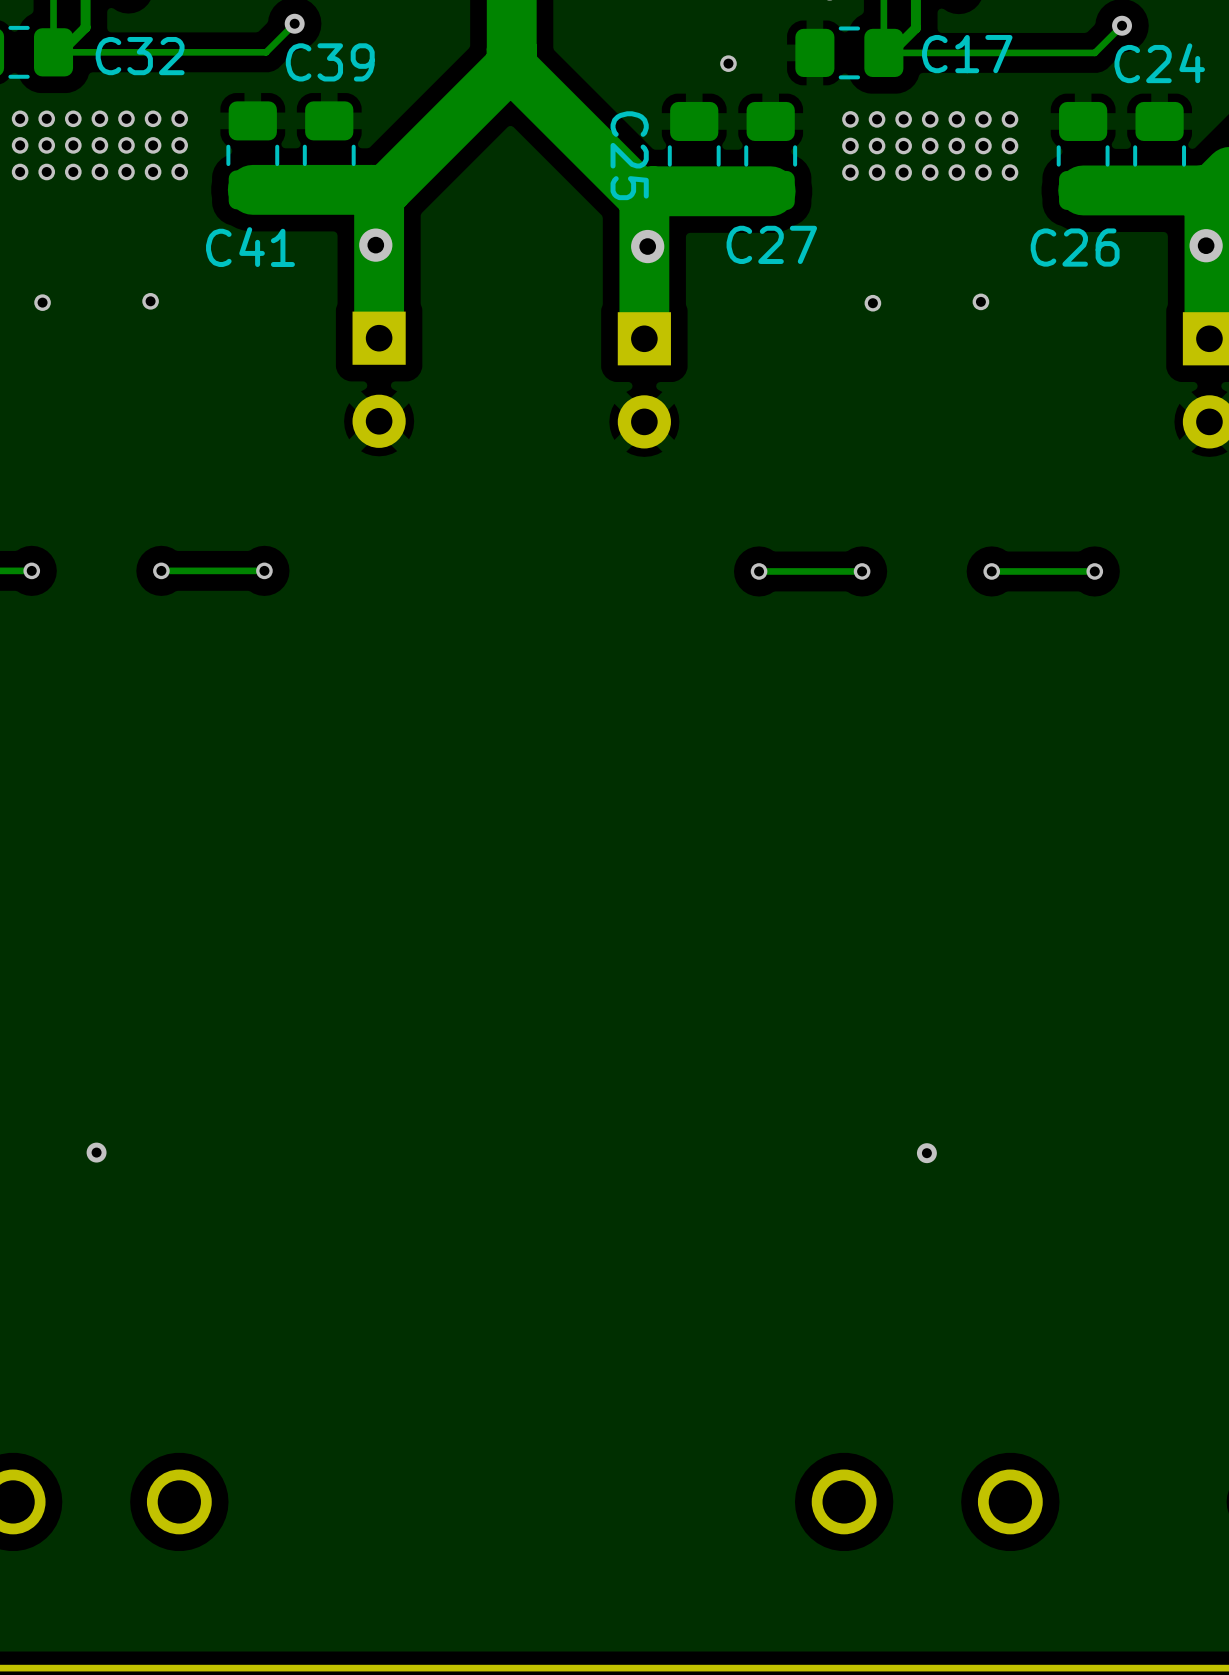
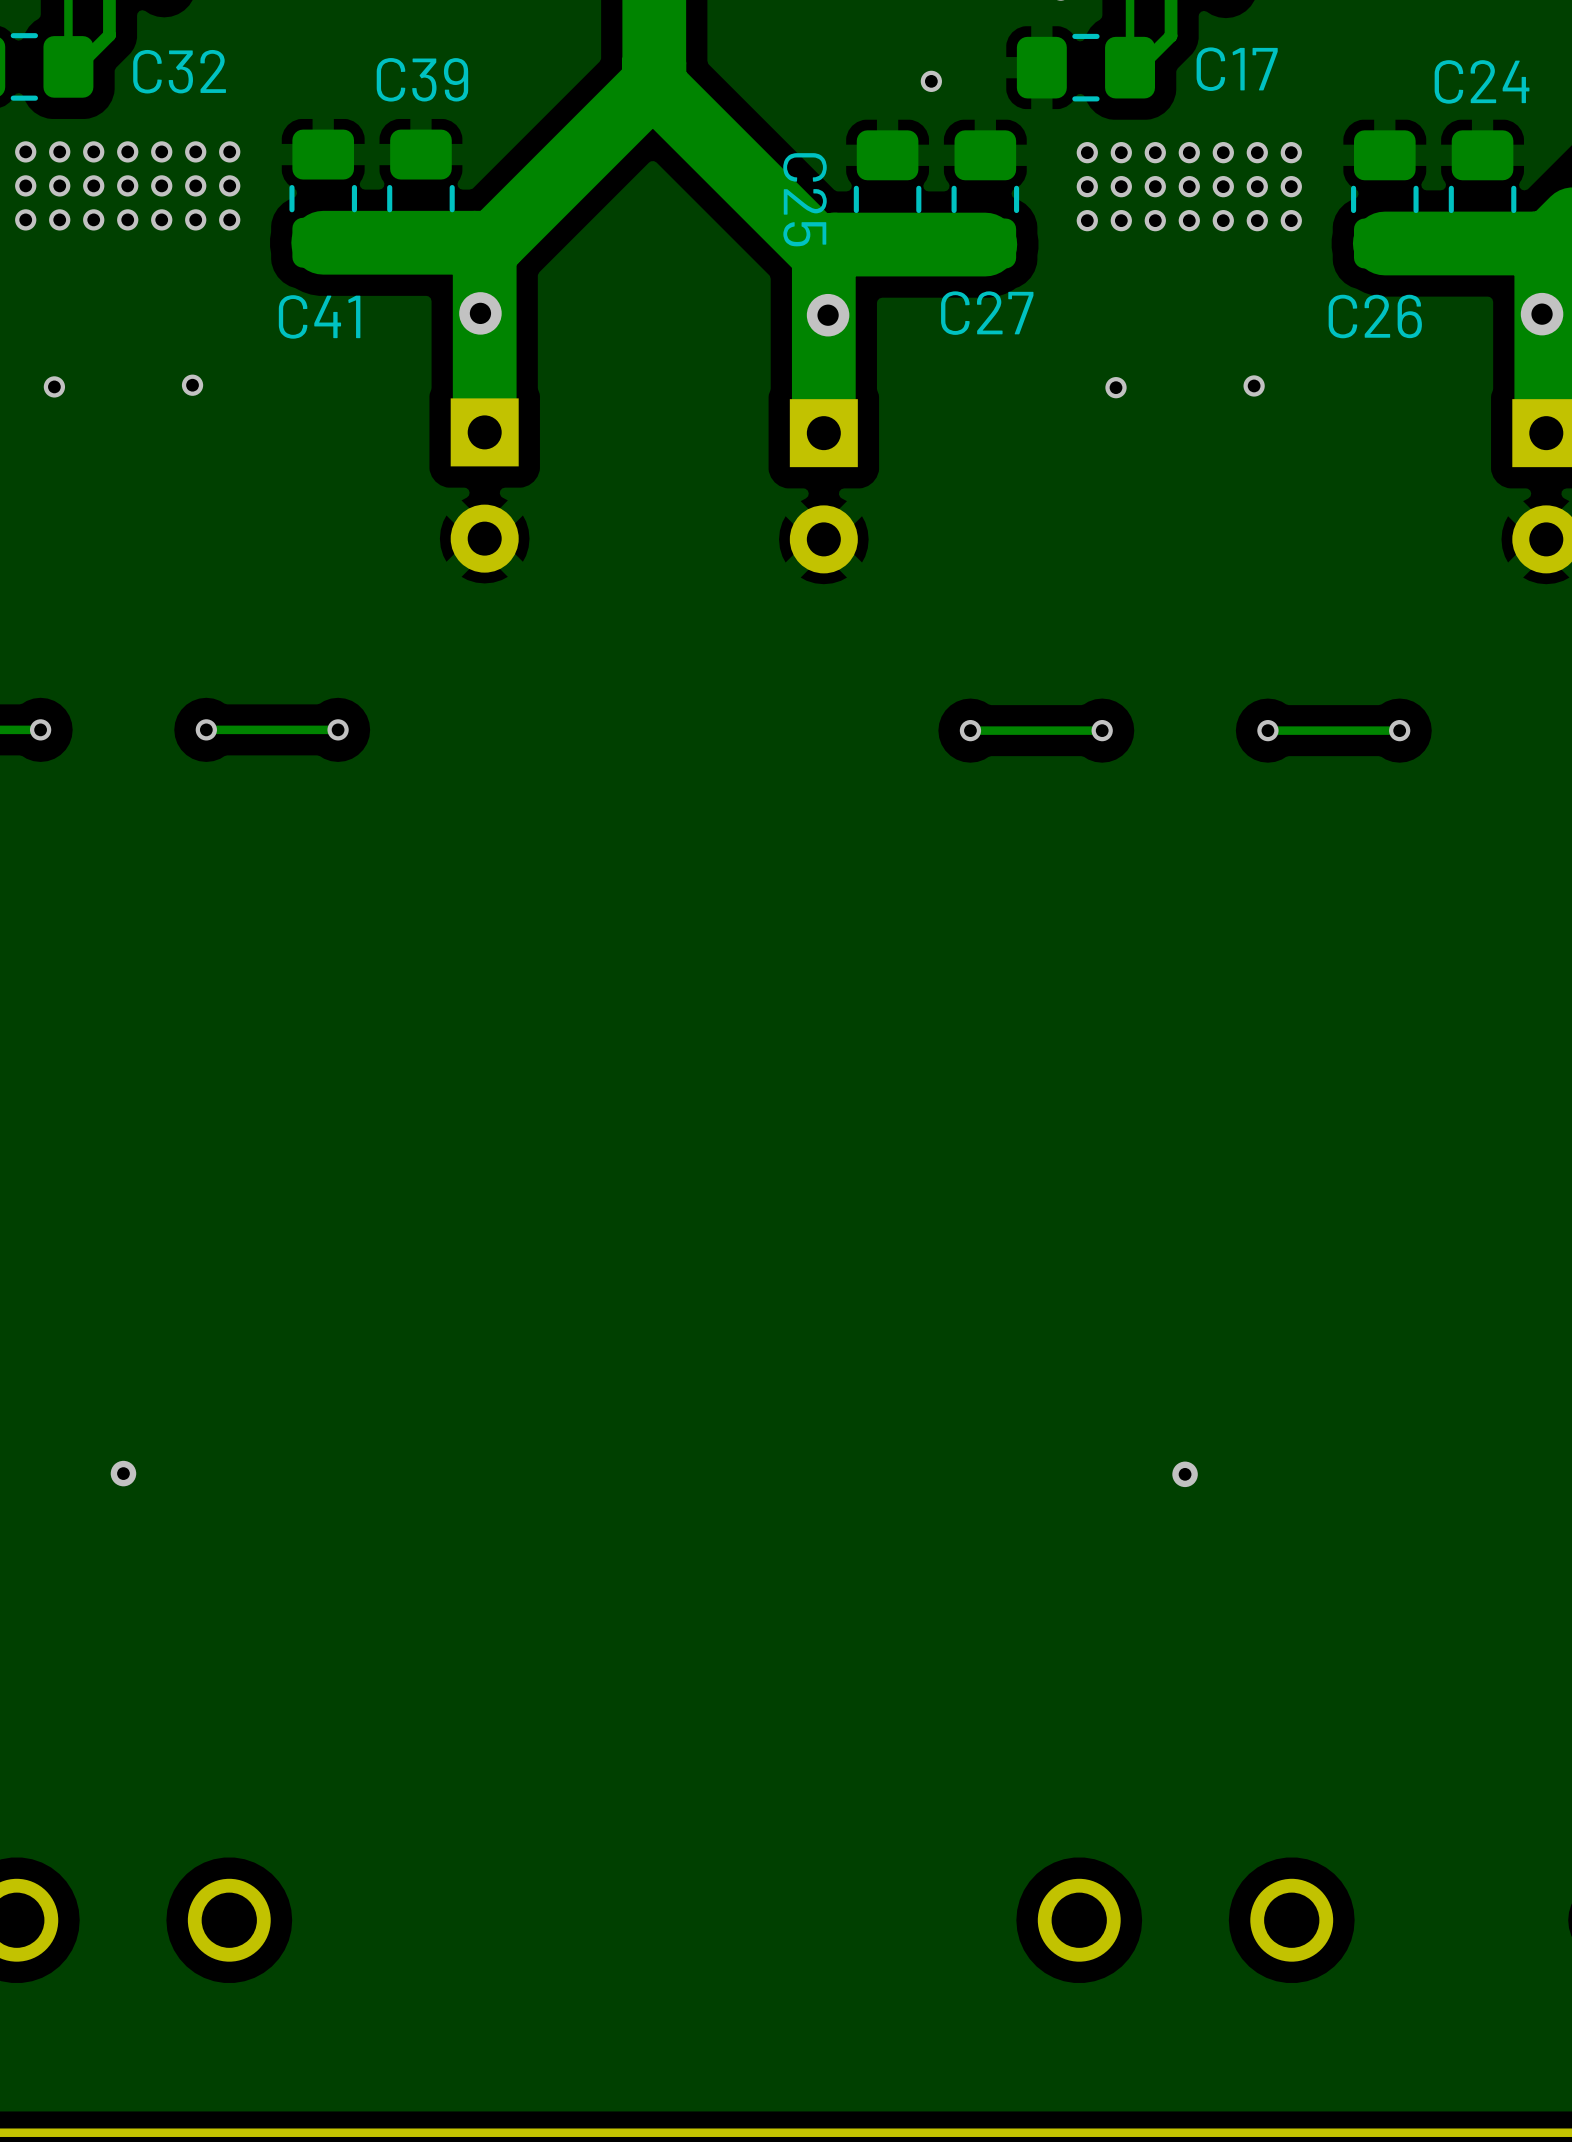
track: (294, 23) (266, 52) (53, 52) -> none
via: (294, 23) -> none
track: (1122, 25) (1094, 52) (883, 52) -> none
via: (1122, 25) -> none

